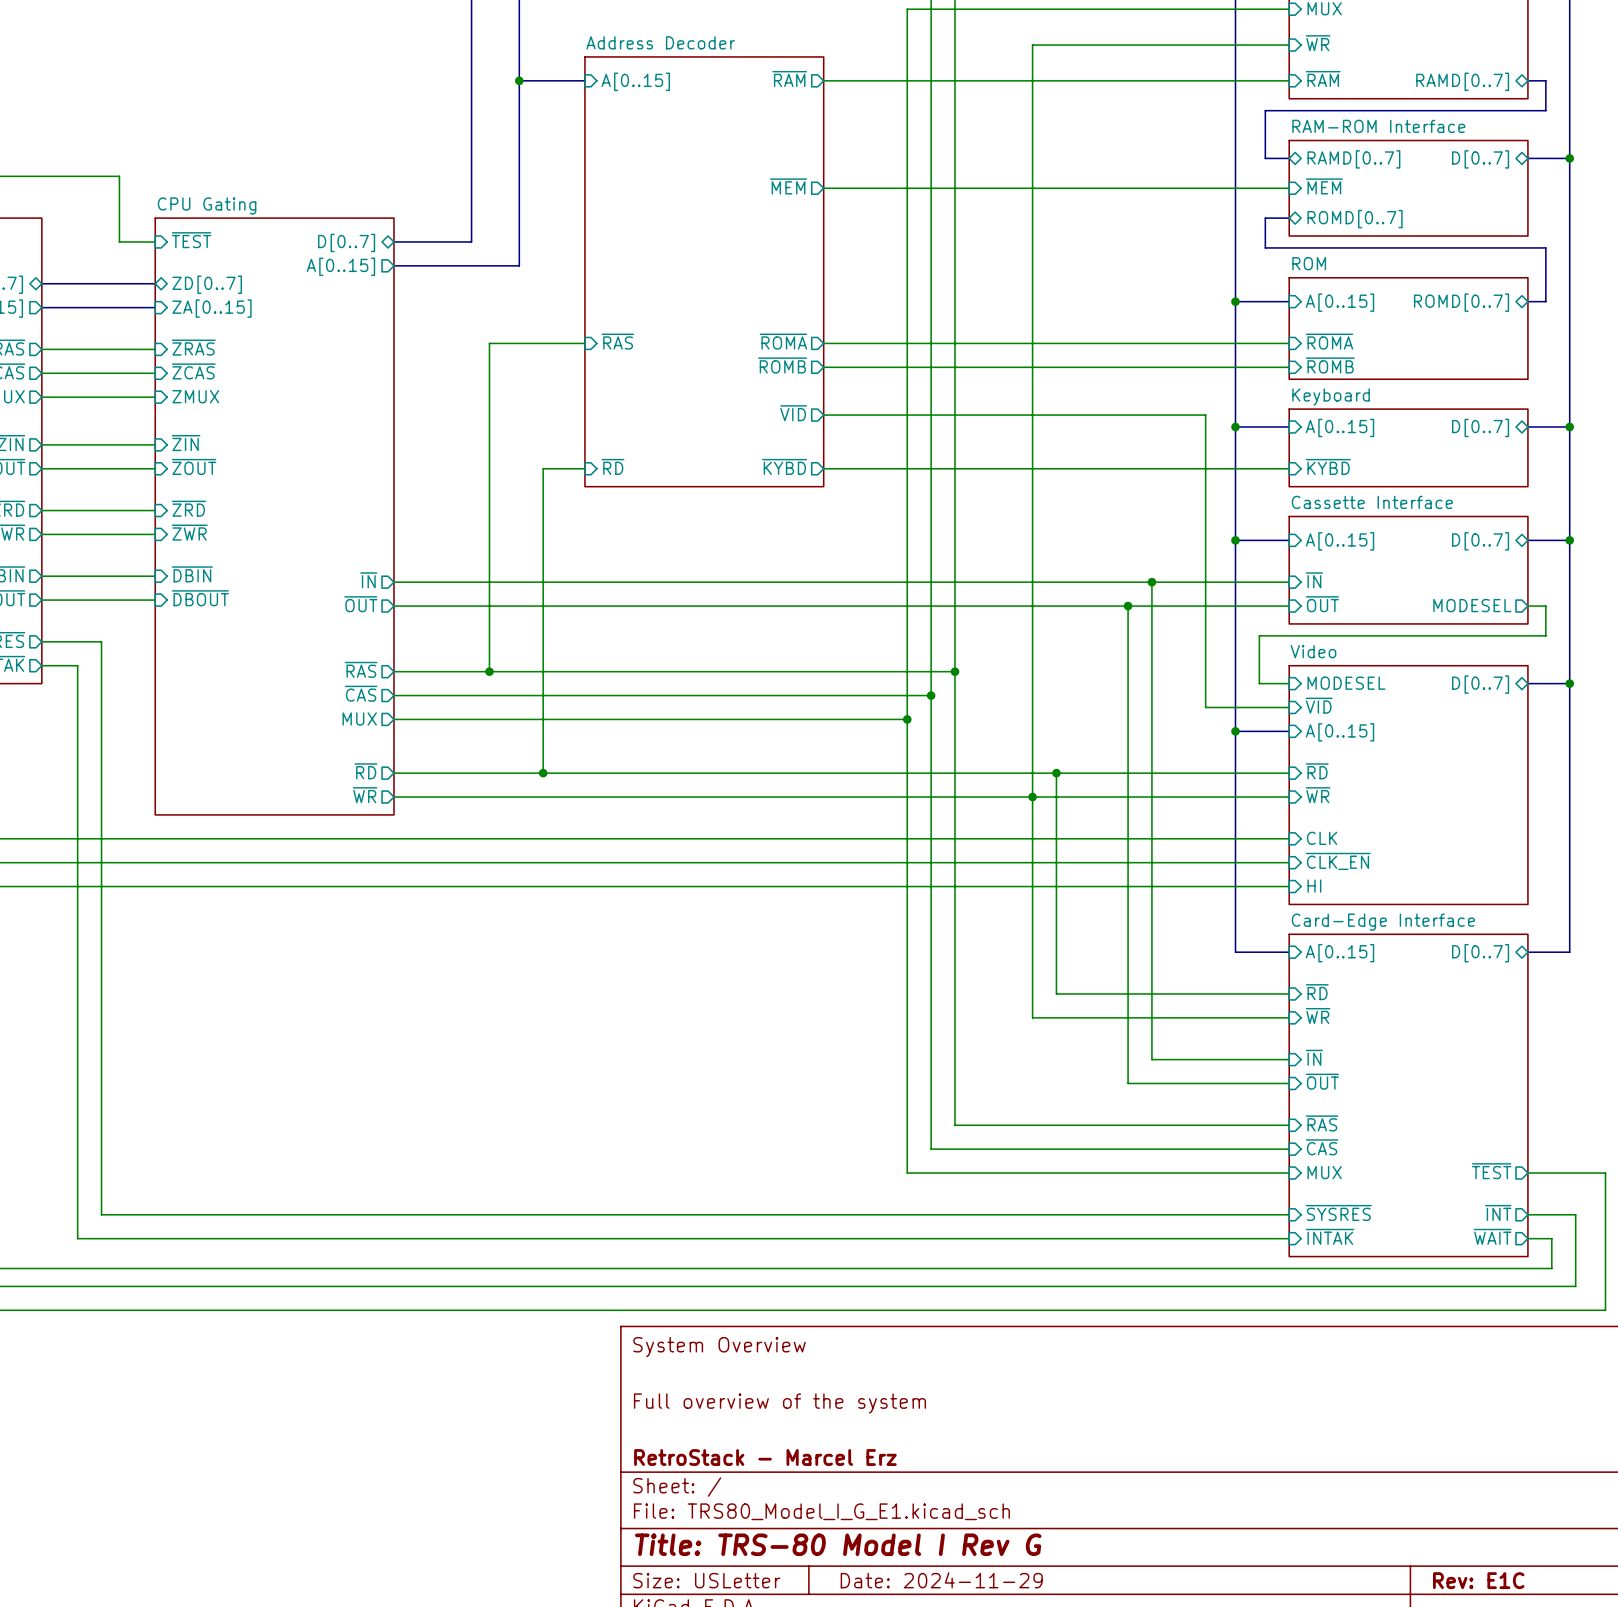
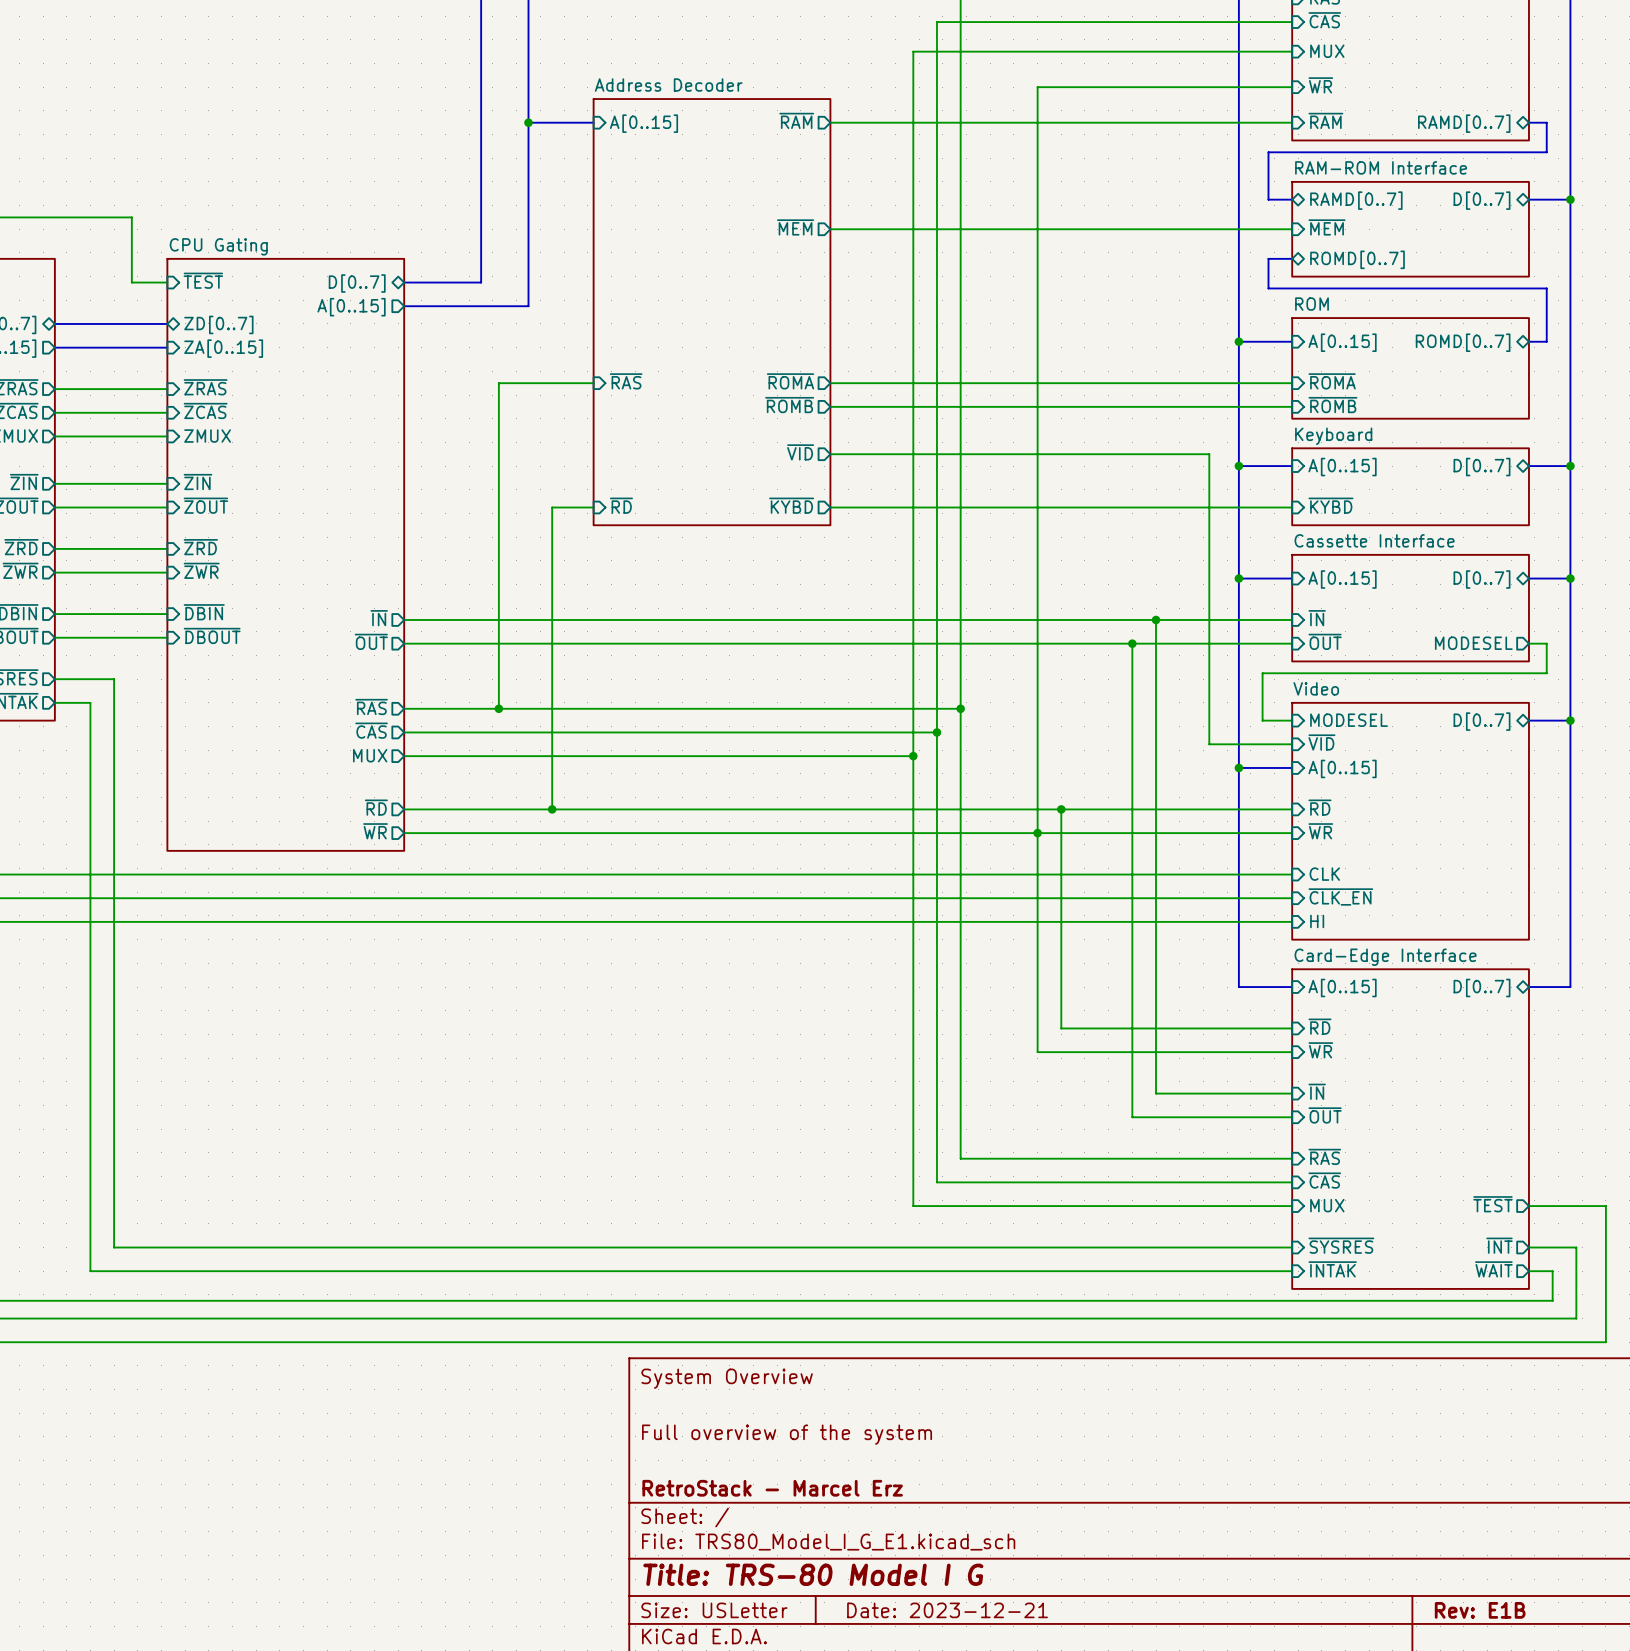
title block: Title: TRS-80 Model I Rev G (838, 1544) -> Title: TRS-80 Model I G (813, 1574)
title block: Date: 2024-11-29 (941, 1580) -> Date: 2023-12-21 (947, 1610)
title block: Rev: E1C (1478, 1580) -> Rev: E1B (1480, 1610)

